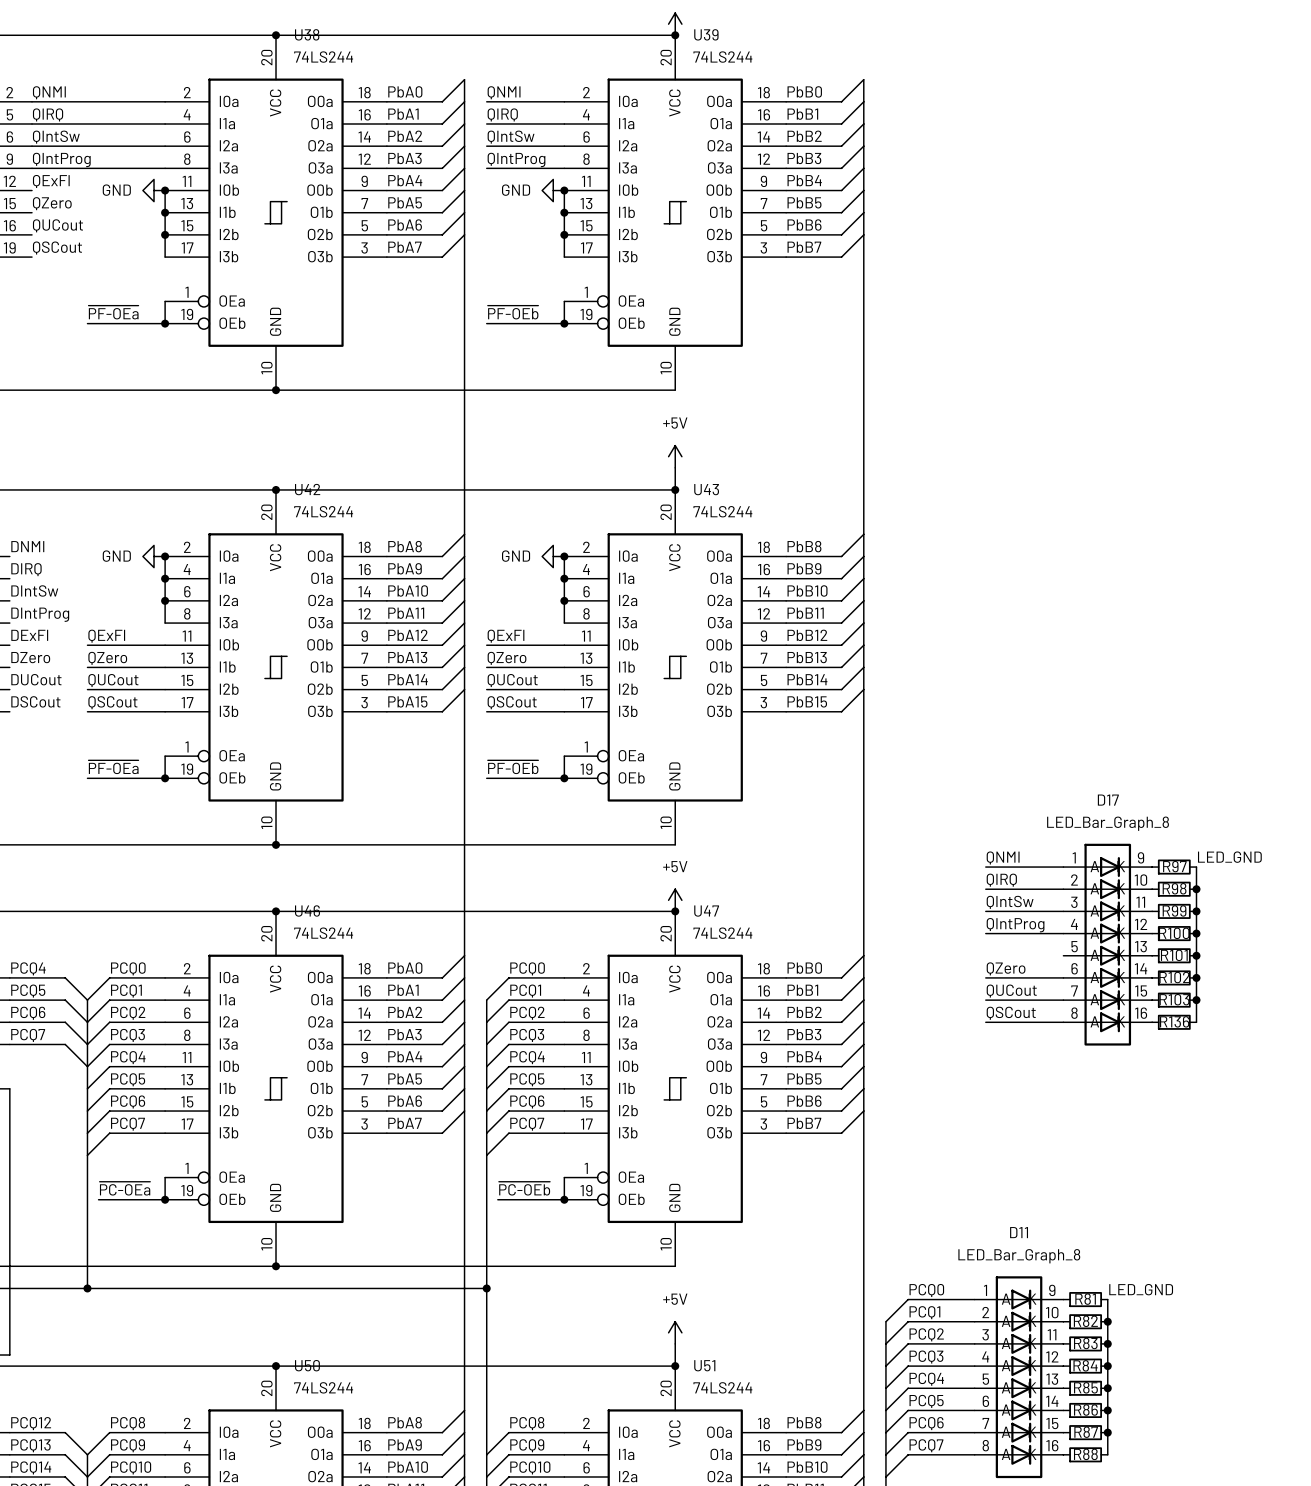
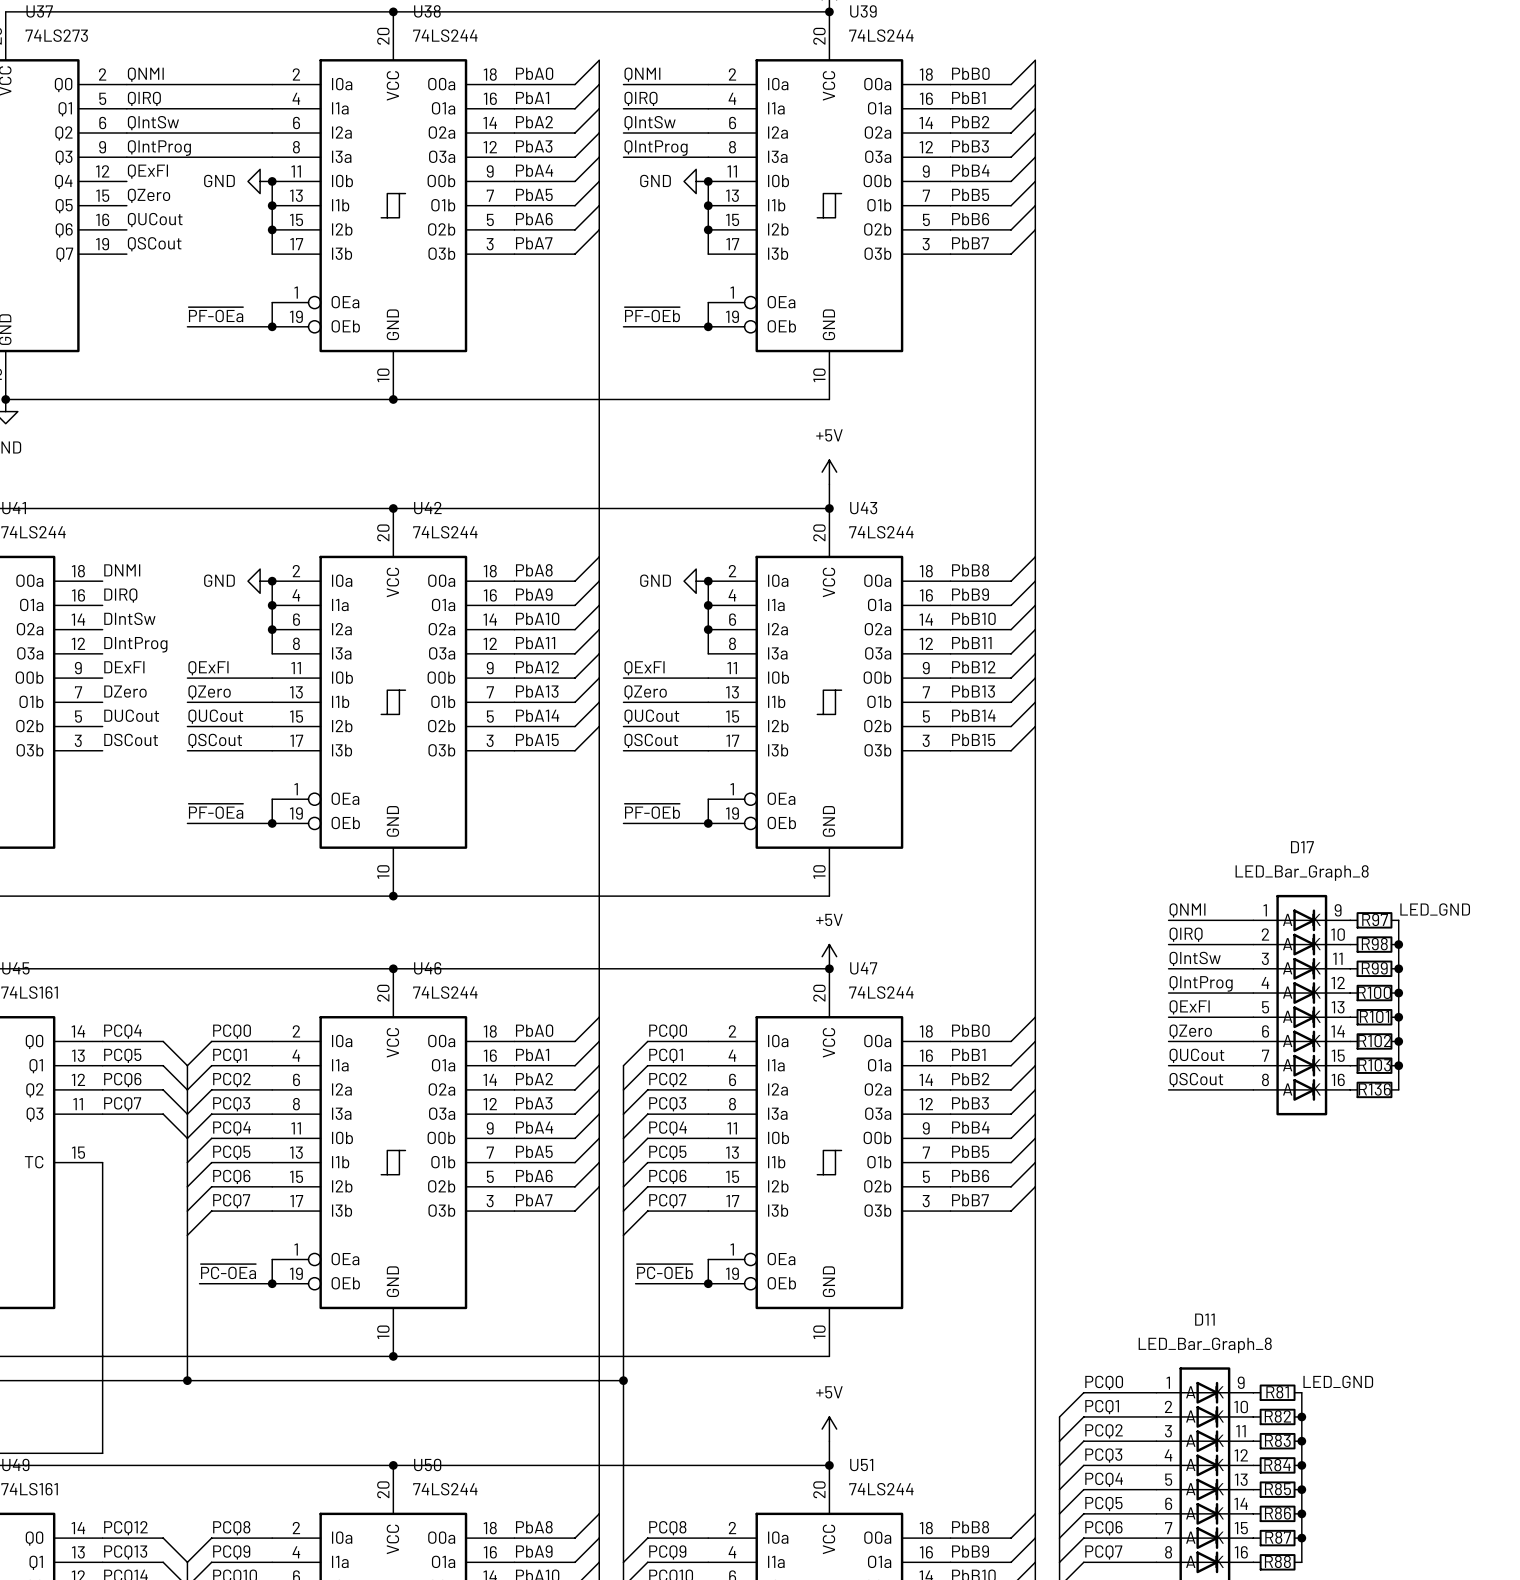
label: none -> QExFl (1189, 1007)
wire: none -> (1168, 1017) (1253, 1017)

